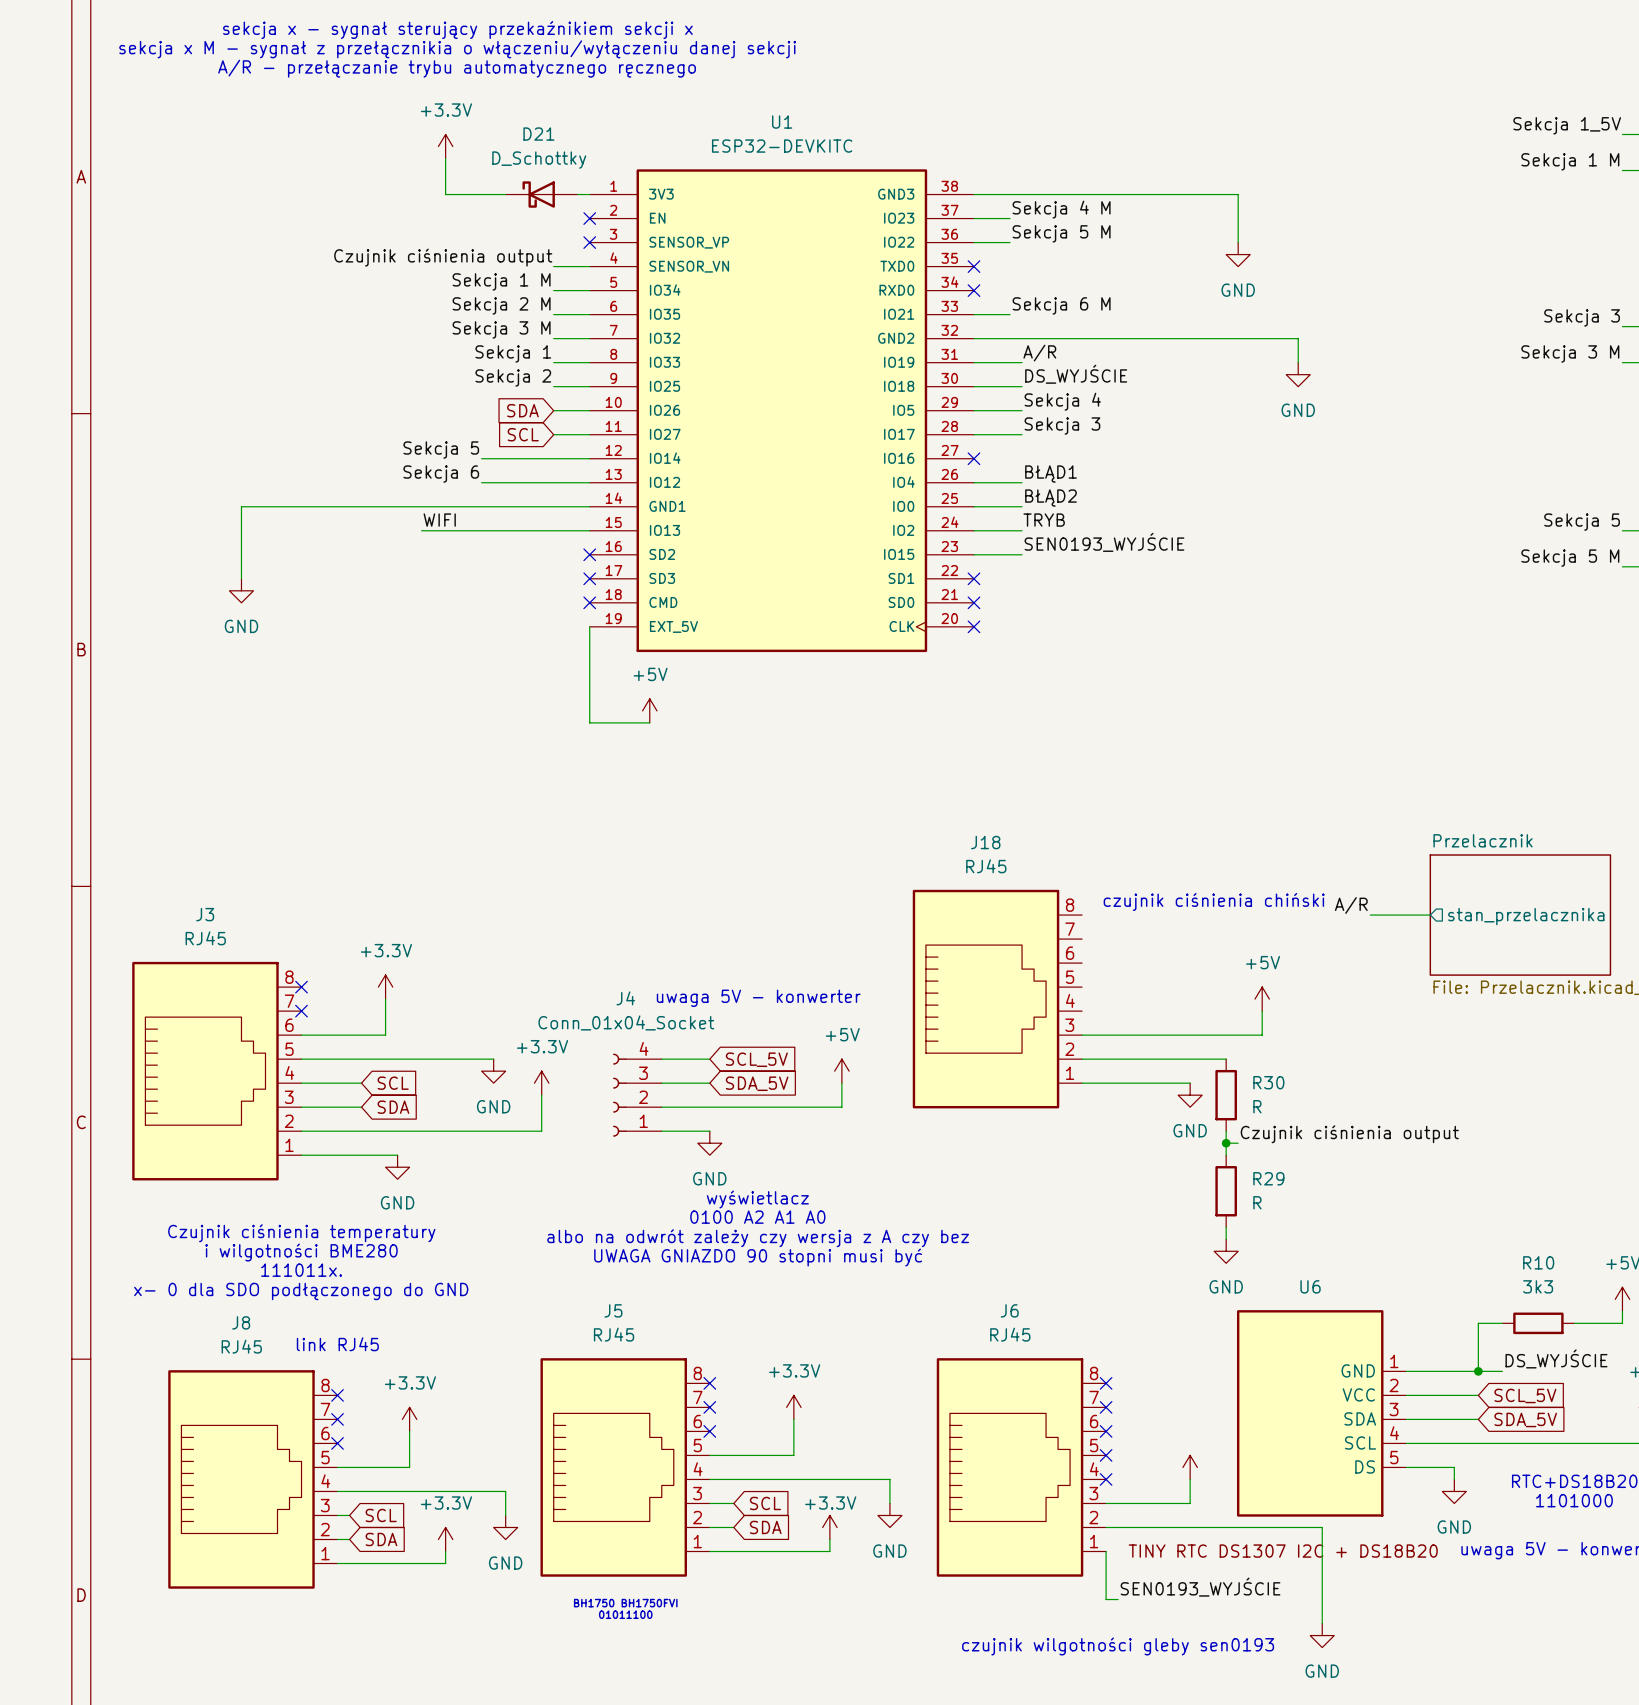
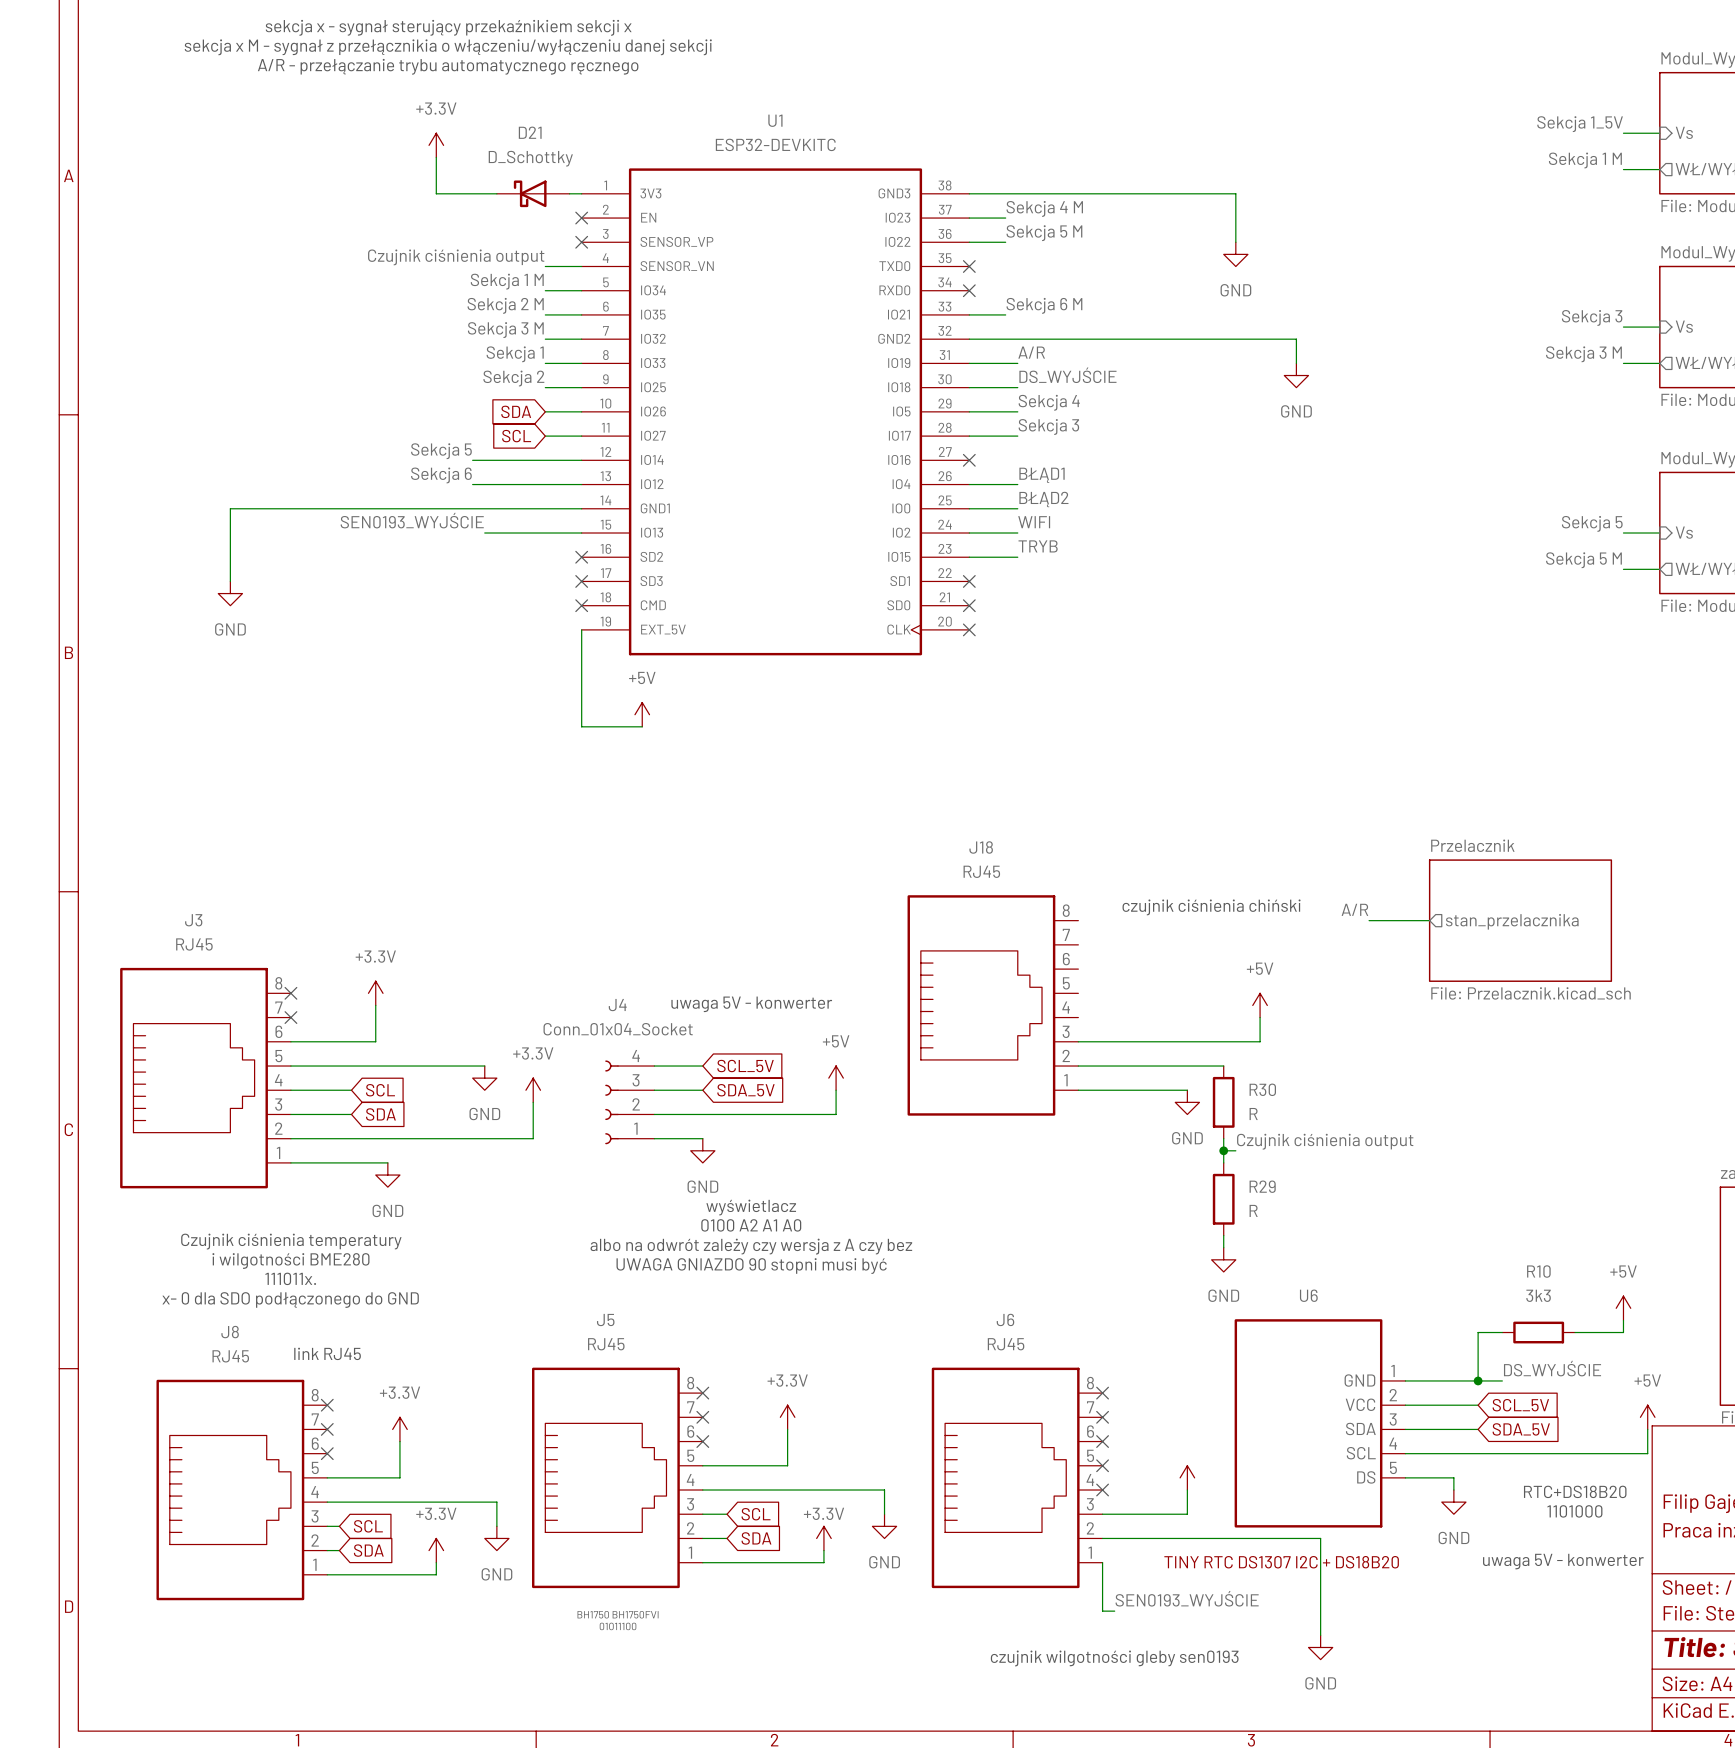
label: none -> SEN0193_WYJŚCIE (412, 520)
label: WIFI (439, 520) -> none
label: TRYB (1044, 520) -> WIFI (1034, 522)
wire: (421, 530) (493, 530) -> none
label: SEN0193_WYJŚCIE (1104, 542) -> TRYB (1038, 546)

